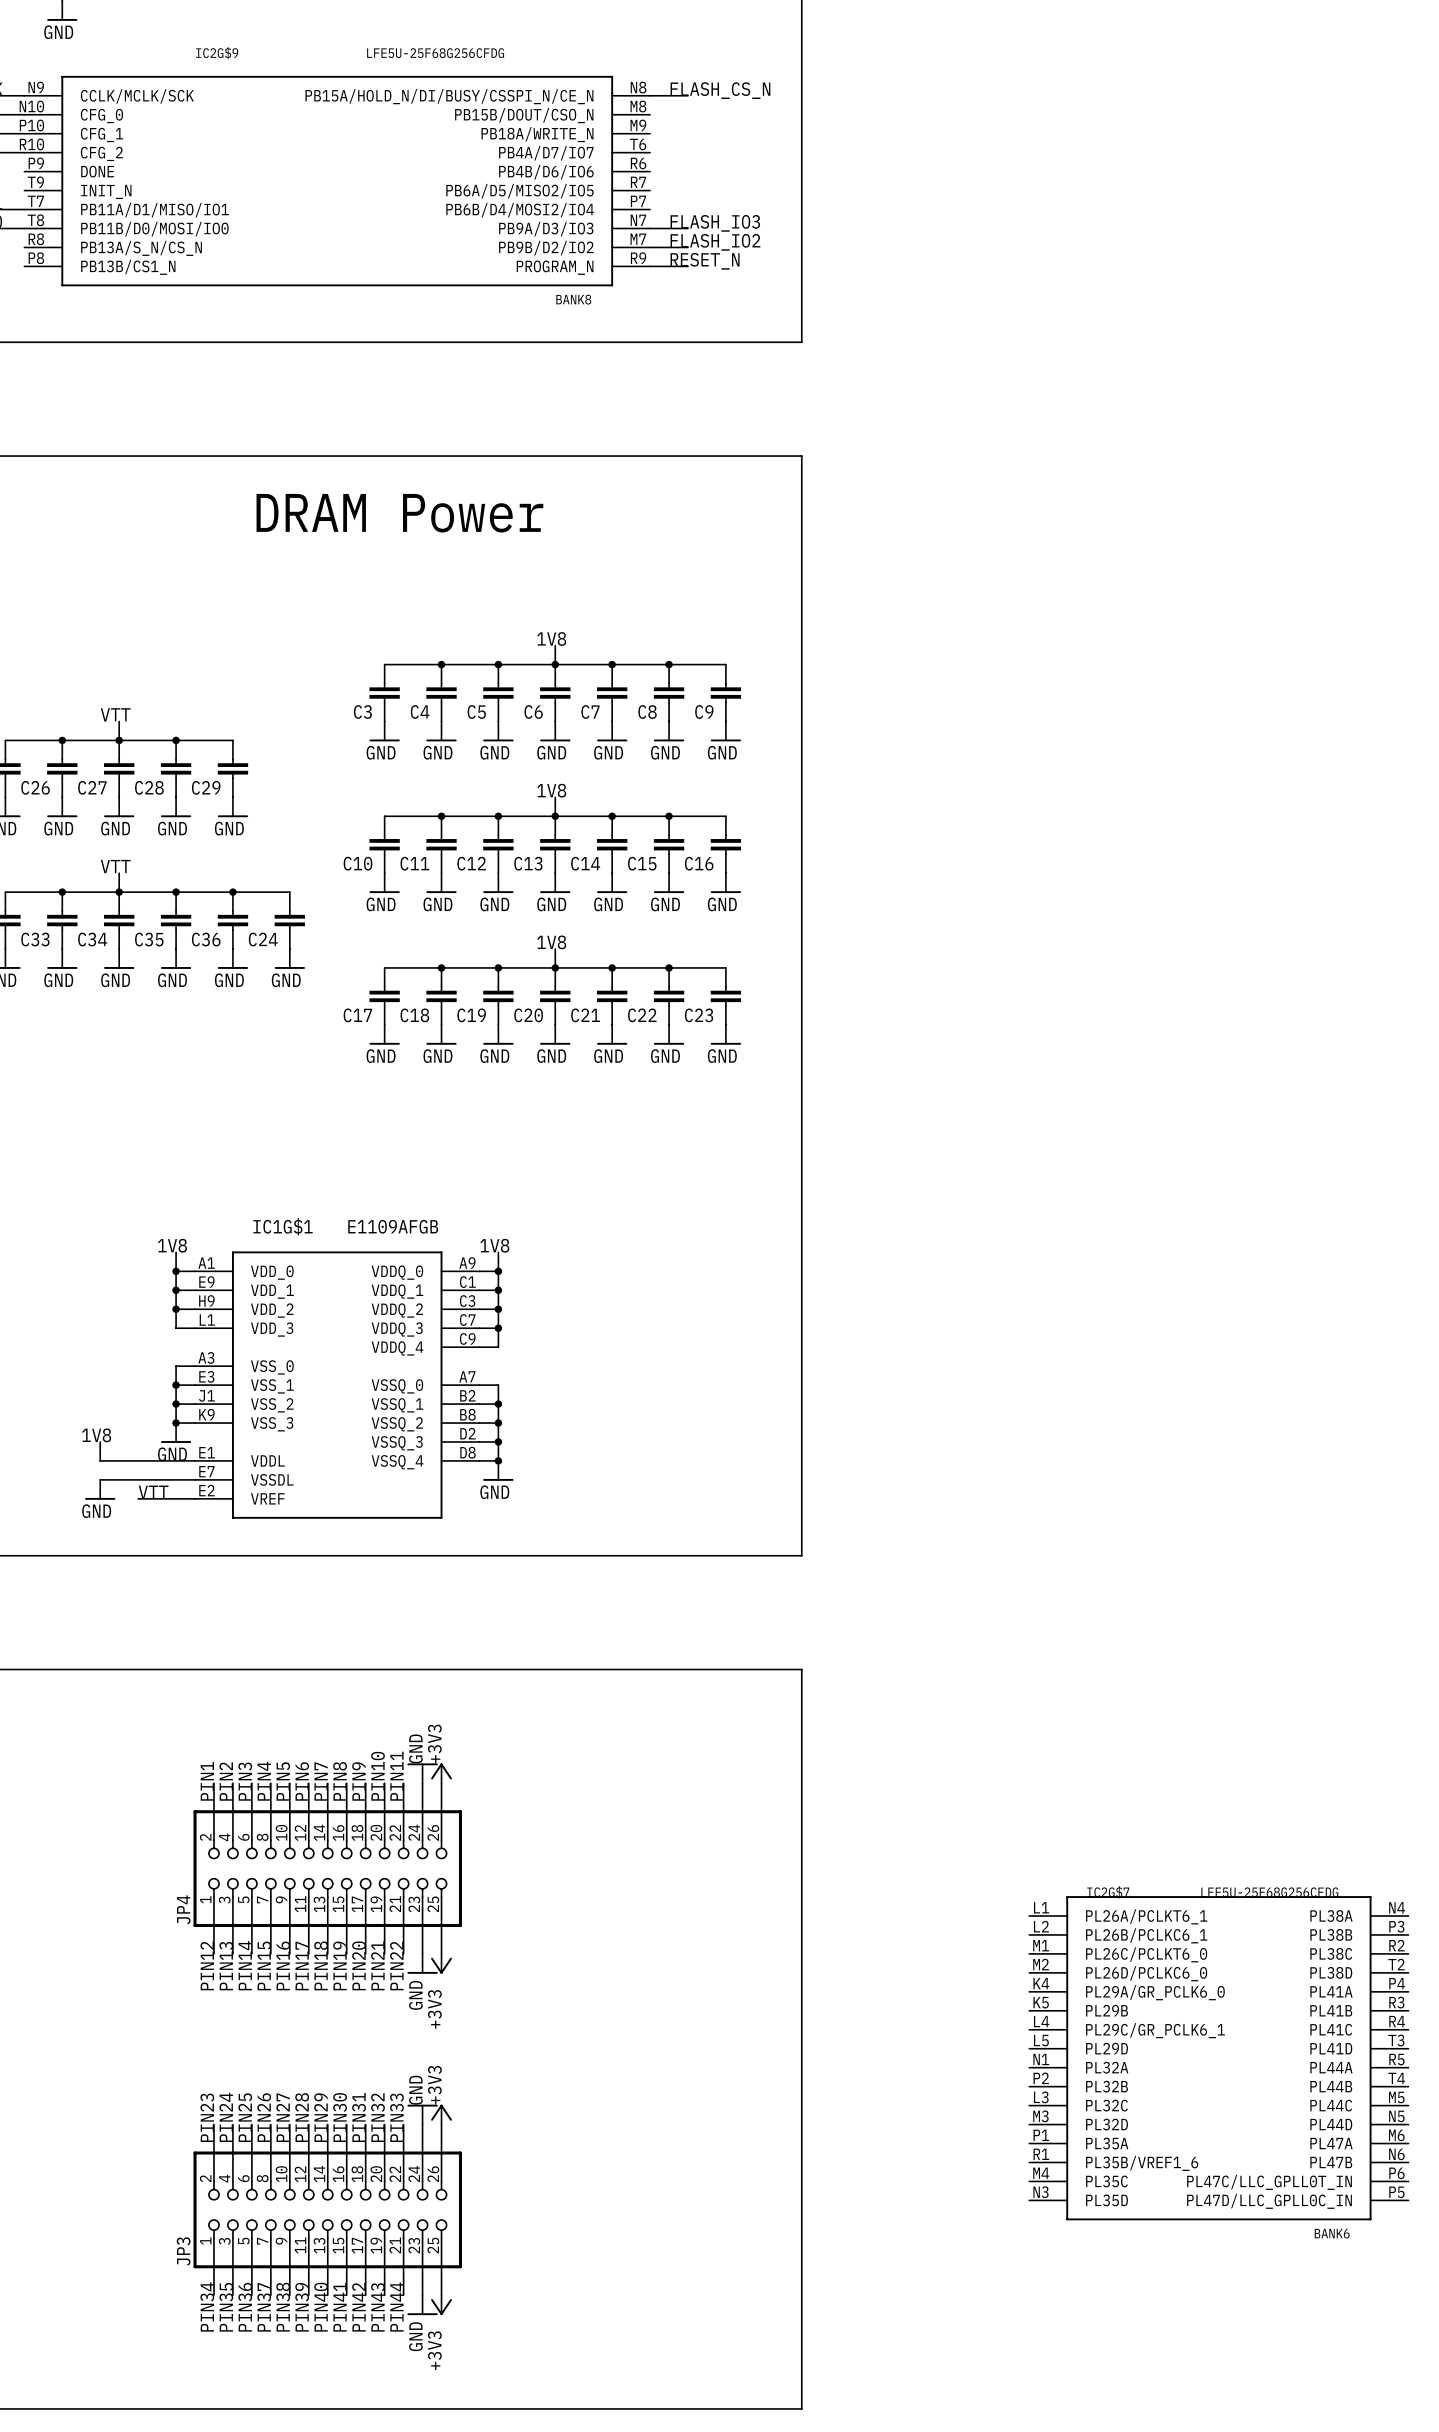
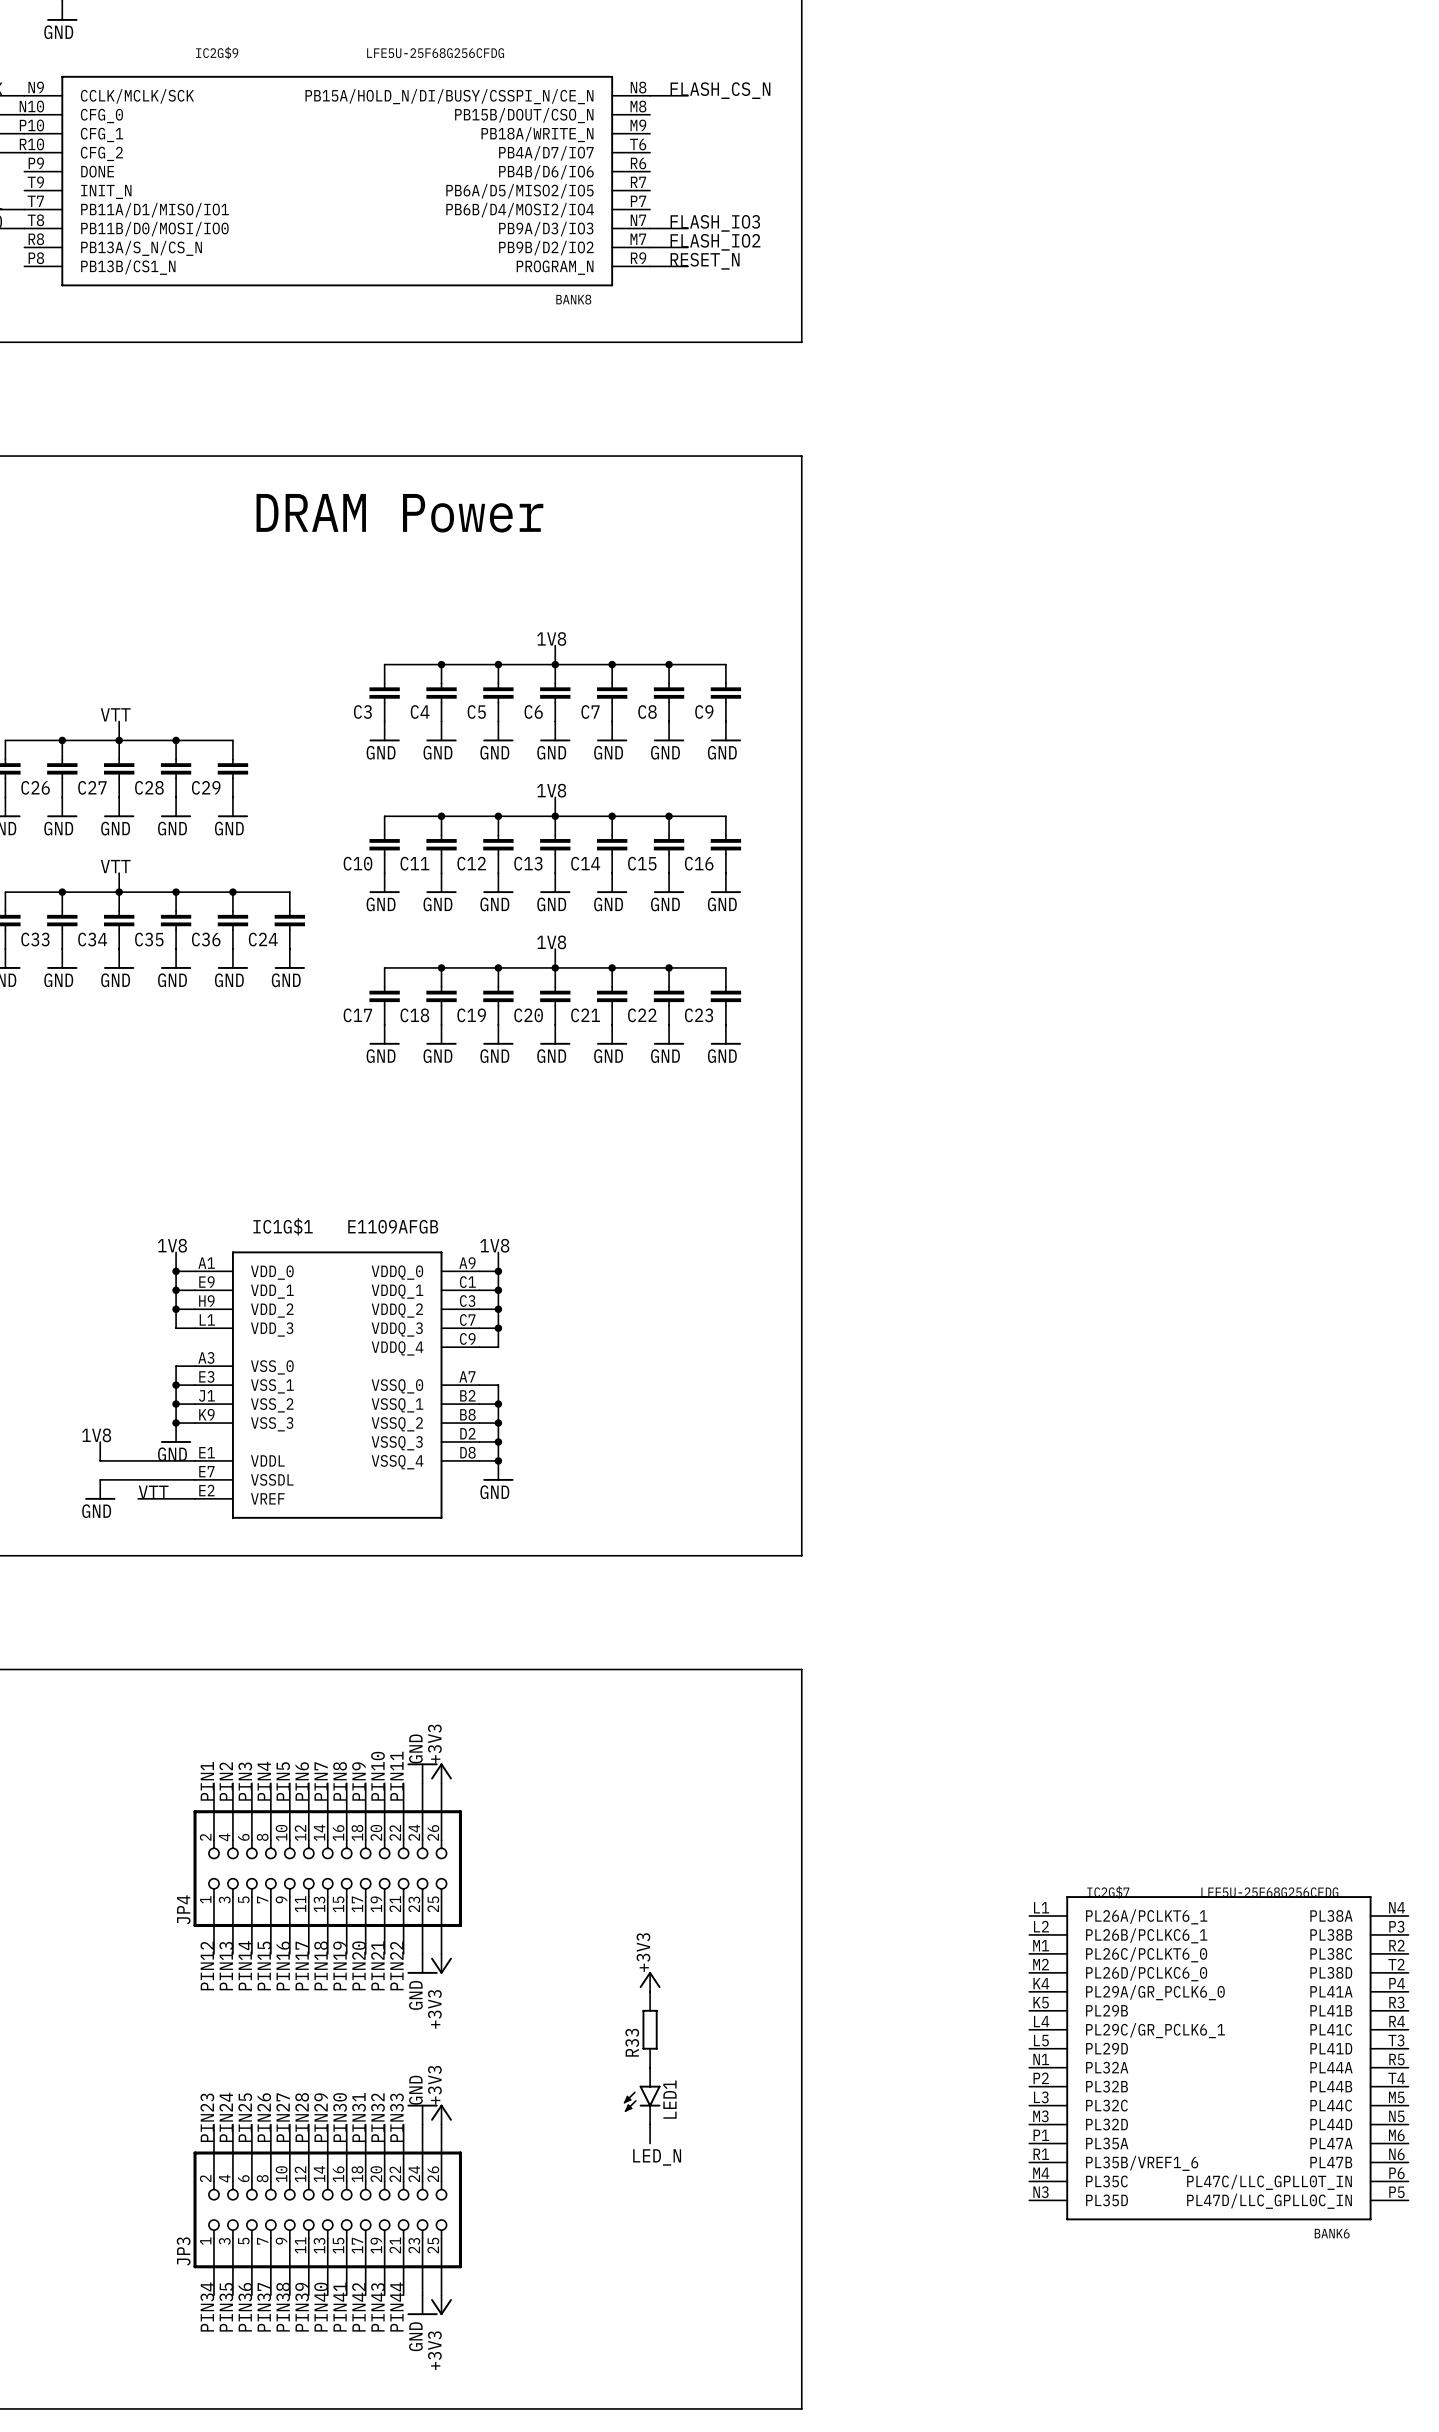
power symbol: none -> +3V3 (650, 1981)
R33: none -> (650, 2029)
LED1: none -> (642, 2096)
wire: none -> (650, 2124) (650, 2143)
label: none -> LED_N (657, 2157)

